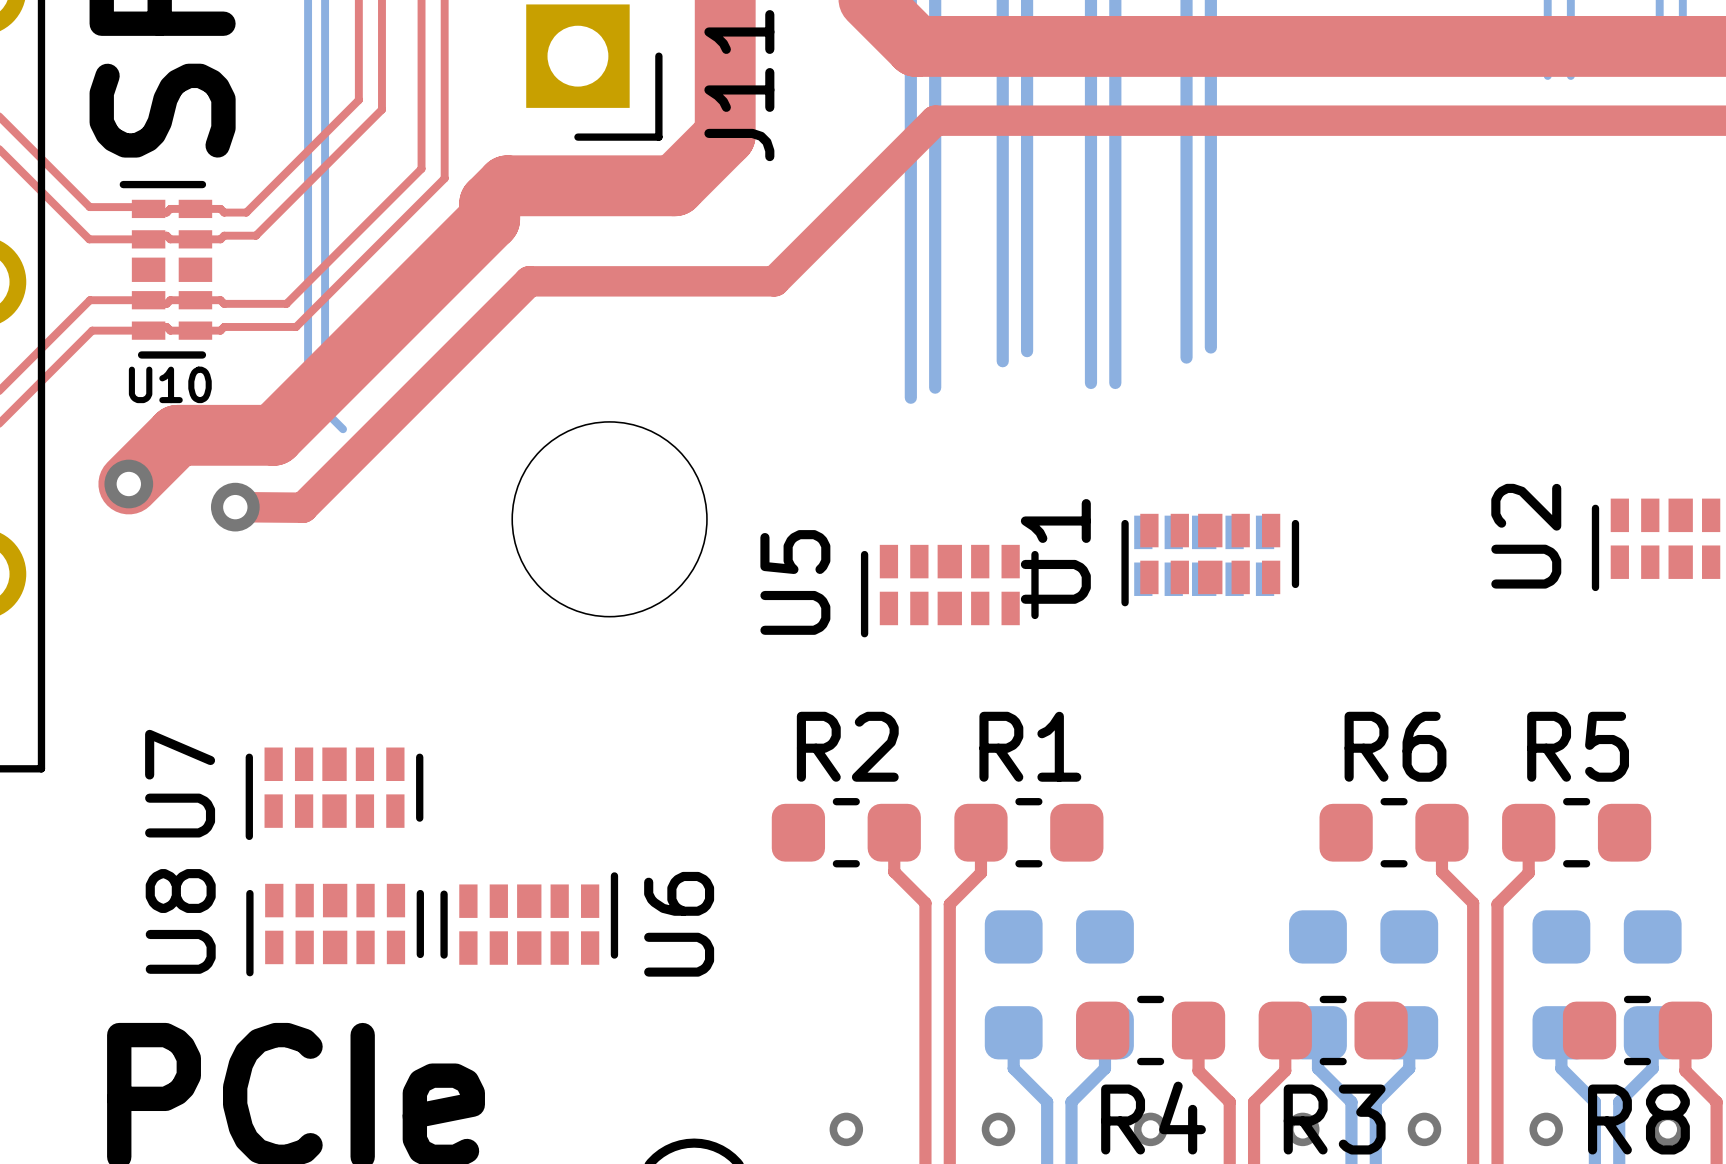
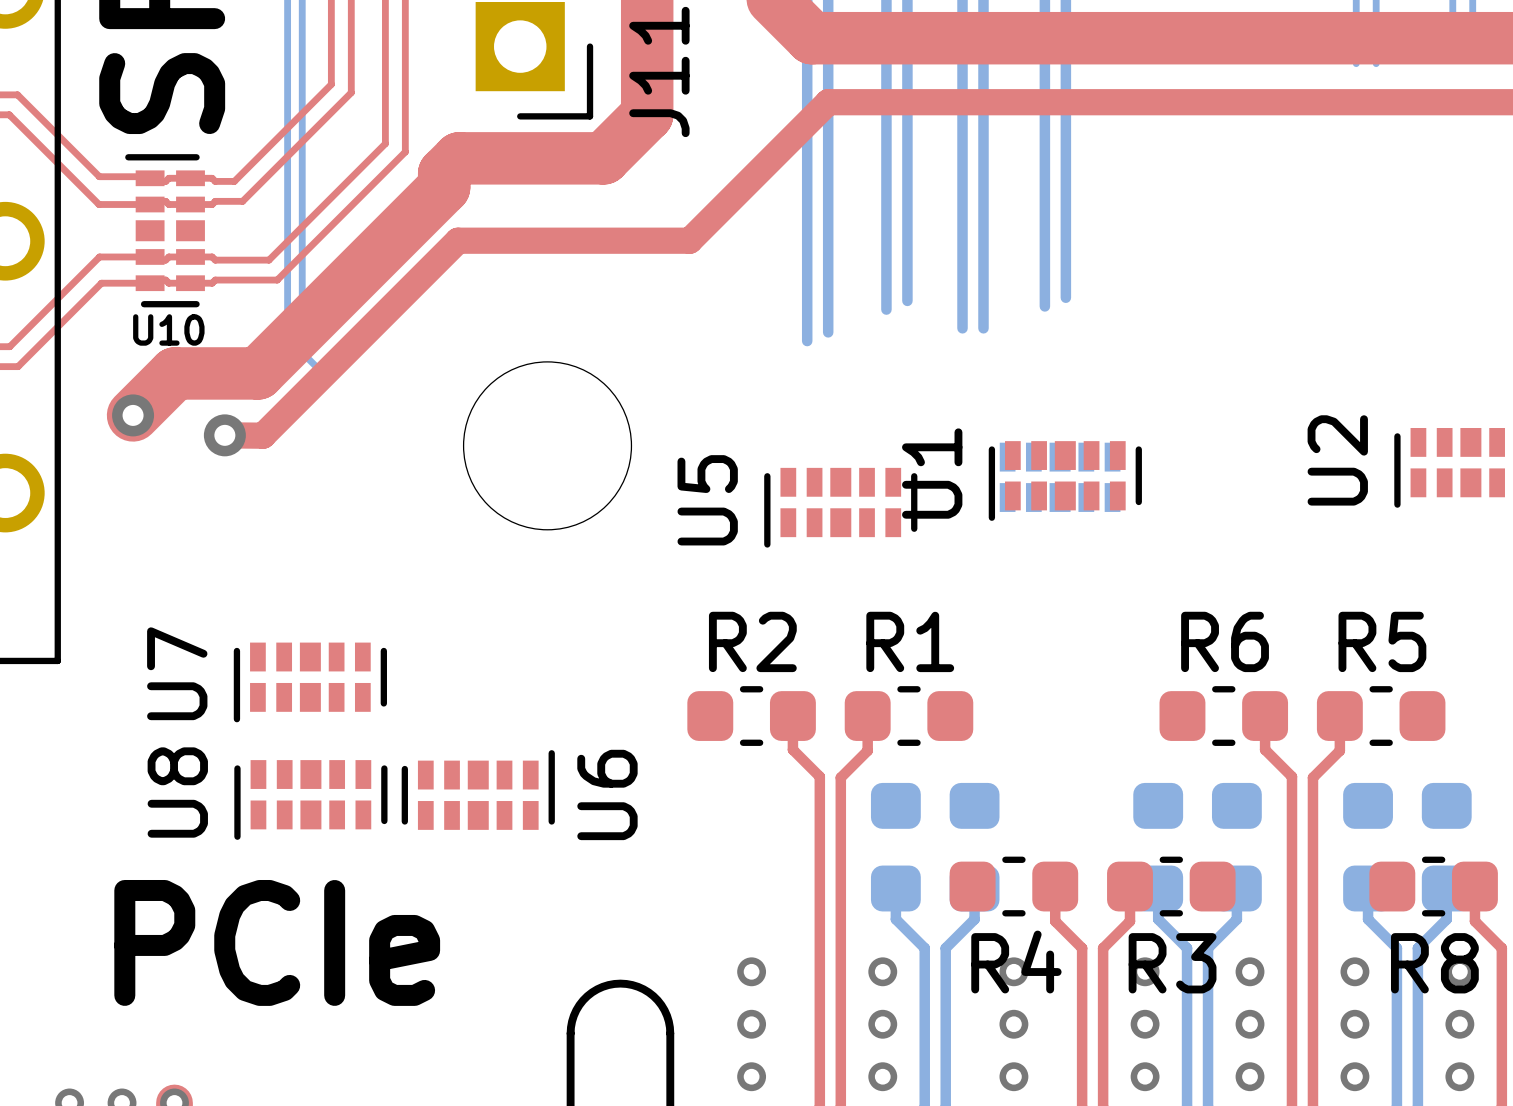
top track: (529, 281) (302, 507) (279, 507) -> (478, 240) (457, 240) (262, 435)

